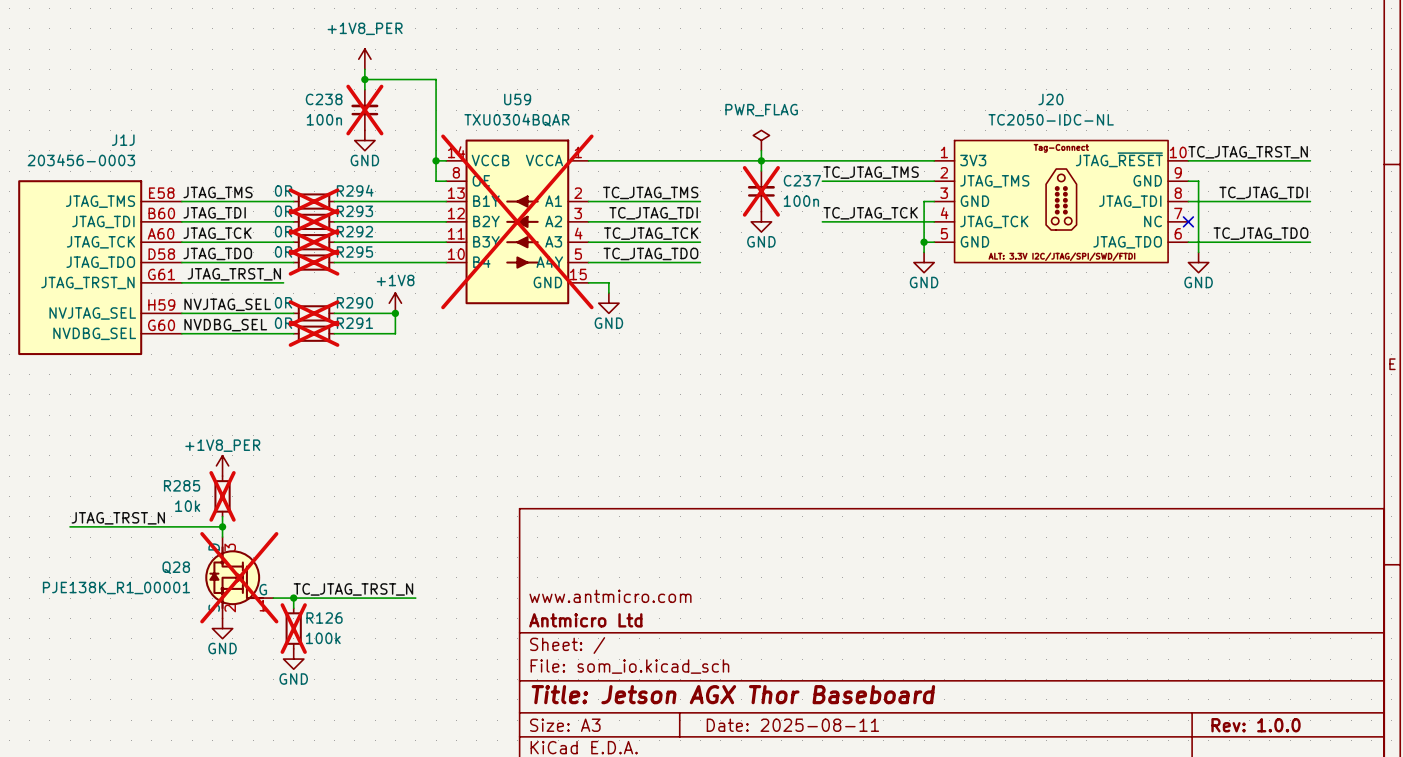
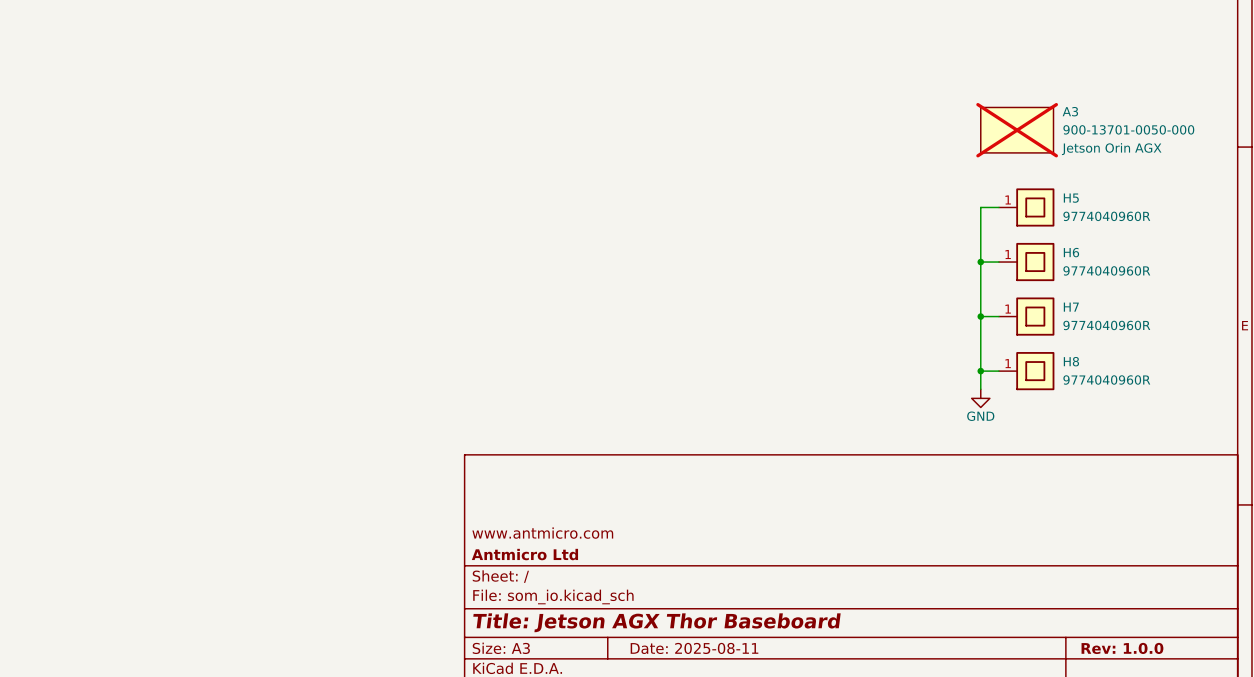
power symbol: +1V8_PER (364, 59) -> none
wire: (364, 69) (364, 89) -> none
wire: (364, 79) (436, 79) (436, 181) (446, 181) -> none
junction: (364, 79) -> none
C238: (364, 110) -> none
power symbol: GND (364, 140) -> none
power symbol: PWR_FLAG (761, 140) -> none
A3: none -> (1017, 130)
wire: (761, 150) (761, 171) -> none
label: TC_JTAG_TRST_N (1248, 152) -> none
wire: (436, 160) (446, 160) -> none
junction: (436, 160) -> none
wire: (588, 160) (934, 160) -> none
junction: (761, 160) -> none
wire: (1188, 160) (1310, 160) -> none
label: TC_JTAG_TMS (871, 172) -> none
wire: (822, 181) (934, 181) -> none
wire: (1188, 181) (1198, 181) (1198, 252) -> none
C237: (761, 191) -> none
label: JTAG_TMS (218, 192) -> none
label: TC_JTAG_TMS (650, 192) -> none
label: TC_JTAG_TDI (1263, 192) -> none
wire: (181, 201) (293, 201) -> none
R294: (314, 201) -> none
wire: (334, 201) (446, 201) -> none
wire: (588, 201) (700, 201) -> none
wire: (934, 201) (924, 201) (924, 252) -> none
J20: (1061, 201) -> none
wire: (1188, 201) (1310, 201) -> none
label: JTAG_TDI (214, 213) -> none
label: TC_JTAG_TDI (653, 213) -> none
label: TC_JTAG_TCK (870, 213) -> none
wire: (181, 221) (293, 221) -> none
R293: (314, 221) -> none
wire: (334, 221) (446, 221) -> none
U59: (517, 221) -> none
wire: (588, 221) (700, 221) -> none
power symbol: GND (761, 221) -> none
wire: (822, 221) (934, 221) -> none
no-connect mark: (1188, 221) -> none
wire: none -> (998, 207) (980, 207) (980, 389)
H5: none -> (1026, 207)
label: JTAG_TCK (217, 233) -> none
label: TC_JTAG_TCK (651, 233) -> none
label: TC_JTAG_TDO (1260, 233) -> none
wire: (181, 242) (293, 242) -> none
R292: (314, 242) -> none
wire: (334, 242) (446, 242) -> none
wire: (588, 242) (700, 242) -> none
wire: (924, 242) (934, 242) -> none
junction: (924, 242) -> none
wire: (1188, 242) (1310, 242) -> none
label: JTAG_TDO (217, 253) -> none
label: TC_JTAG_TDO (650, 253) -> none
wire: (181, 262) (293, 262) -> none
R295: (314, 262) -> none
wire: (334, 262) (446, 262) -> none
wire: (588, 262) (700, 262) -> none
power symbol: GND (924, 262) -> none
power symbol: GND (1198, 262) -> none
J1J: (100, 267) -> none
label: JTAG_TRST_N (234, 274) -> none
wire: (181, 282) (283, 282) -> none
wire: (588, 282) (608, 282) (608, 293) -> none
wire: none -> (980, 262) (998, 262)
junction: none -> (980, 262)
H6: none -> (1026, 262)
power symbol: +1V8 (395, 303) -> none
power symbol: GND (608, 303) -> none
label: NVJTAG_SEL (227, 304) -> none
wire: (181, 313) (293, 313) -> none
R290: (314, 313) -> none
wire: (334, 313) (395, 313) (395, 333) (334, 333) -> none
junction: (395, 313) -> none
label: NVDBG_SEL (225, 325) -> none
wire: (181, 333) (293, 333) -> none
R291: (314, 333) -> none
wire: none -> (980, 316) (998, 316)
junction: none -> (980, 316)
H7: none -> (1026, 316)
wire: none -> (980, 371) (998, 371)
junction: none -> (980, 371)
H8: none -> (1026, 371)
power symbol: none -> GND (980, 398)
power symbol: +1V8_PER (222, 465) -> none
R285: (222, 496) -> none
wire: (222, 516) (222, 537) -> none
label: JTAG_TRST_N (118, 518) -> none
wire: (70, 526) (222, 526) -> none
junction: (222, 526) -> none
Q28: (239, 577) -> none
label: TC_JTAG_TRST_N (353, 589) -> none
wire: (273, 598) (415, 598) -> none
wire: (293, 598) (293, 608) -> none
junction: (293, 598) -> none
power symbol: GND (222, 628) -> none
R126: (293, 628) -> none
power symbol: GND (293, 659) -> none

